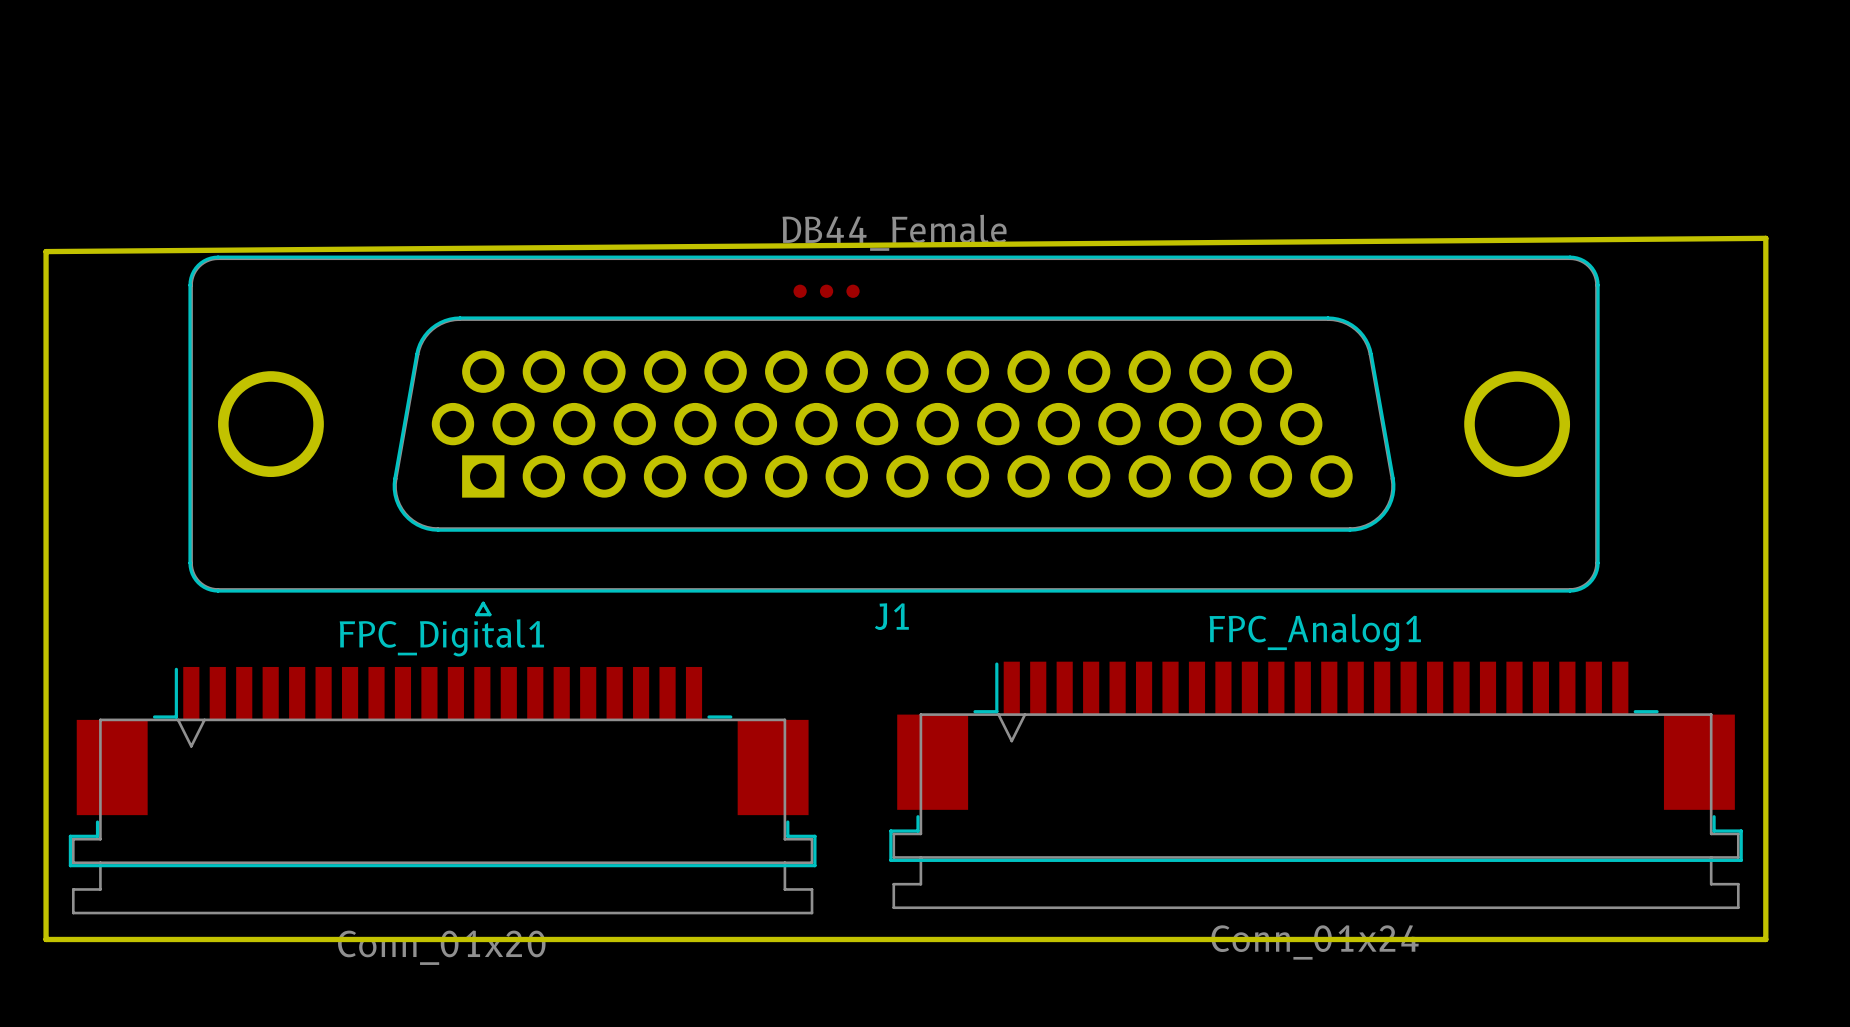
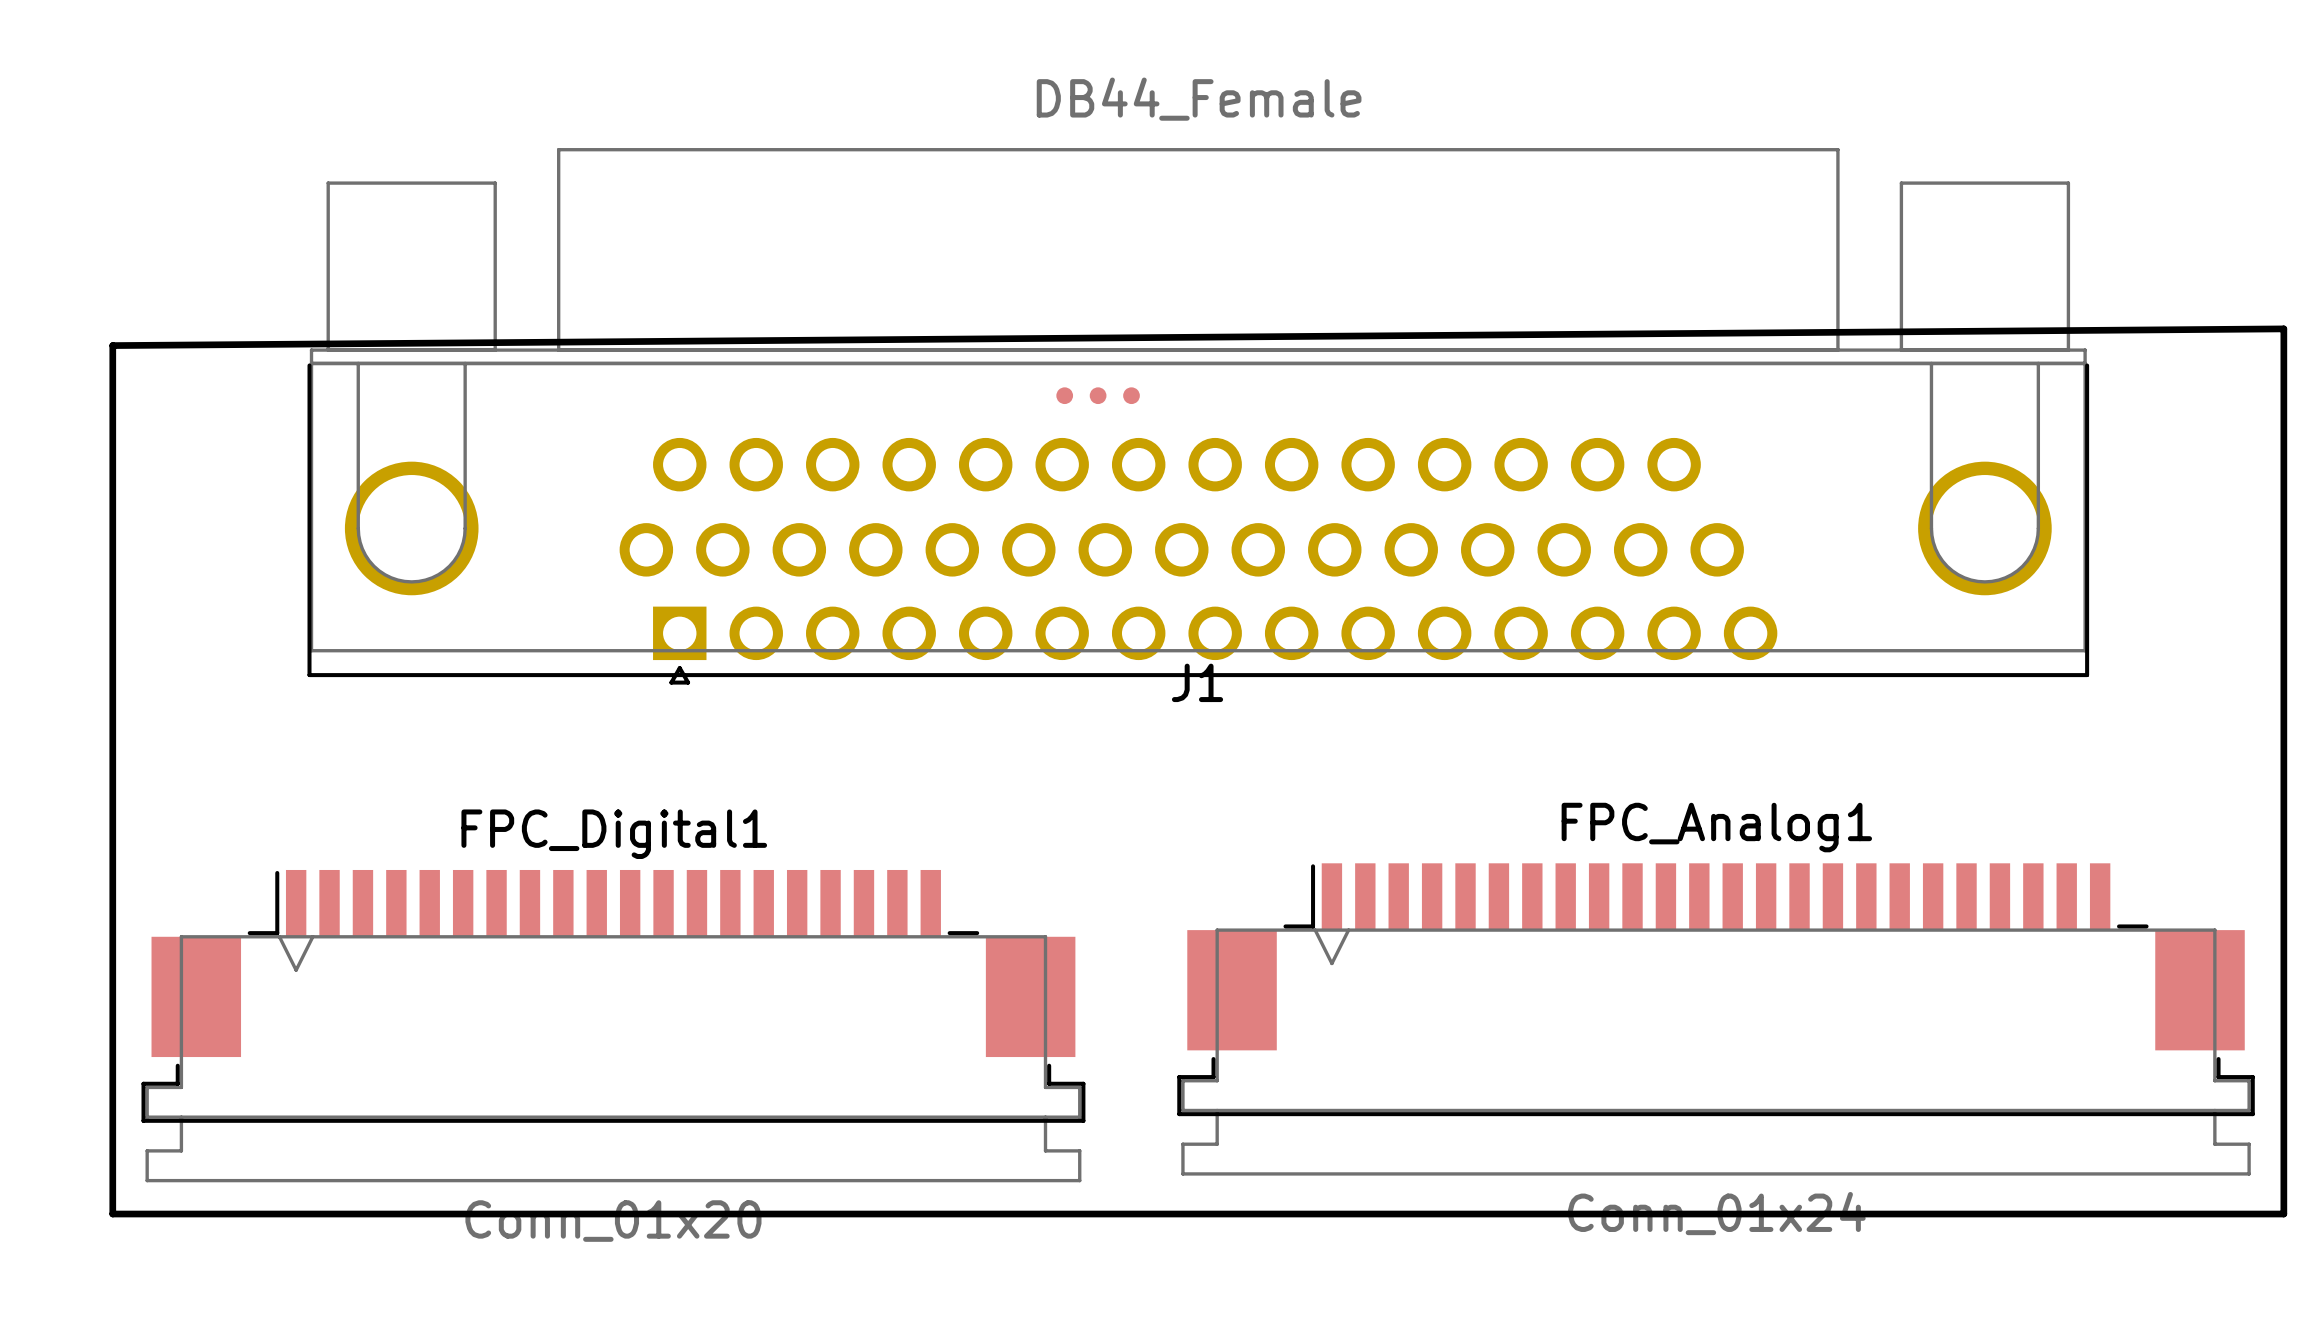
J1 footprint: [188, 255, 1600, 617] -> [307, 148, 2090, 685]

